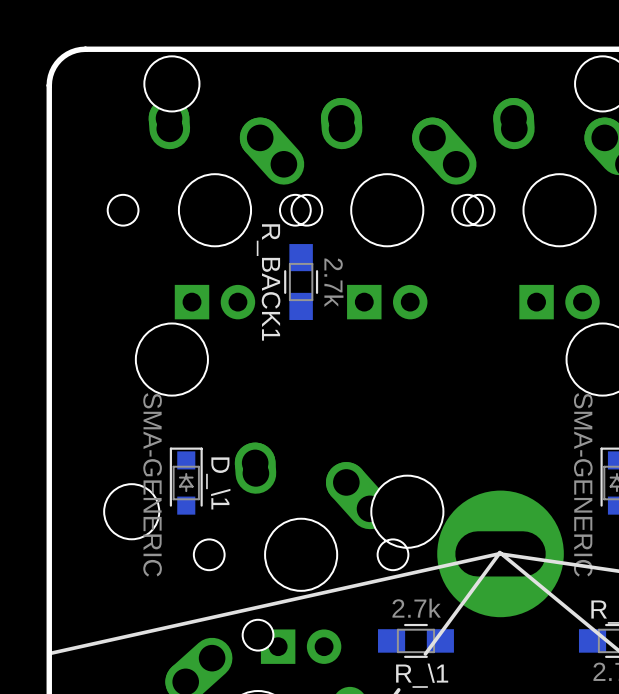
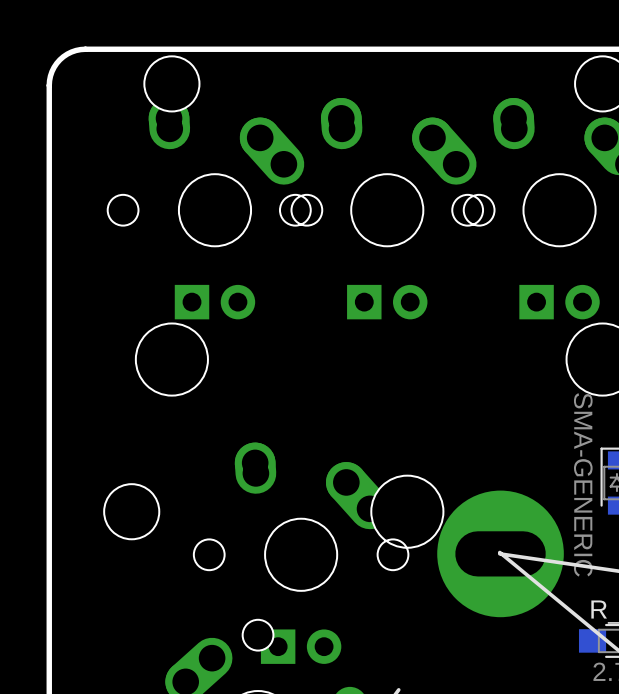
R_BACK1: 2.7k (301, 282) -> none
D_\1: SMA-GENERIC (186, 481) -> none
line: (499, 552) (425, 654) -> none
line: (499, 553) (49, 653) -> none
R_\1: 2.7k (415, 640) -> none

